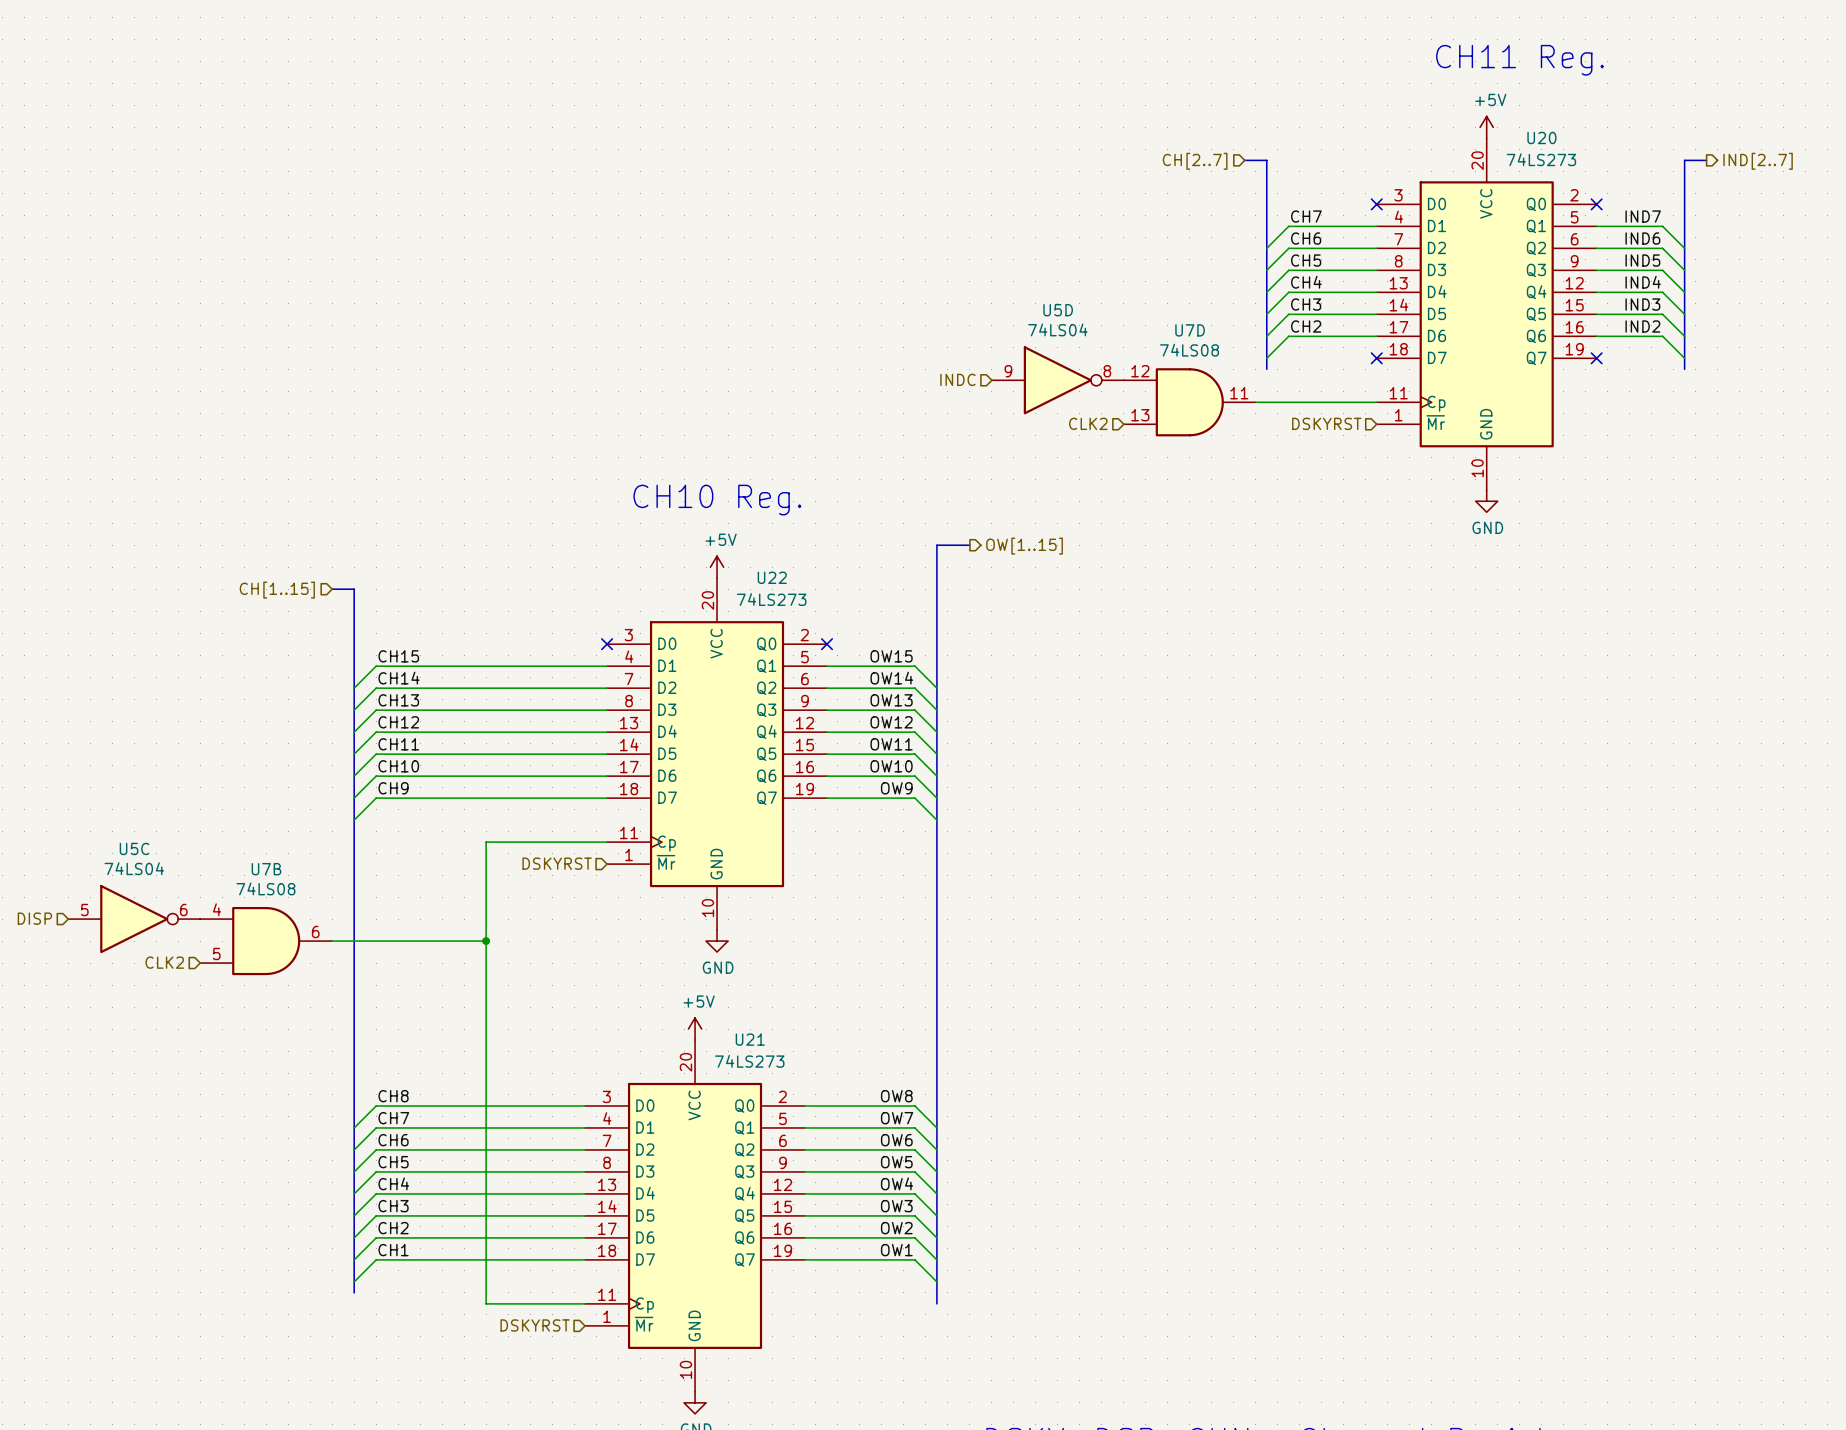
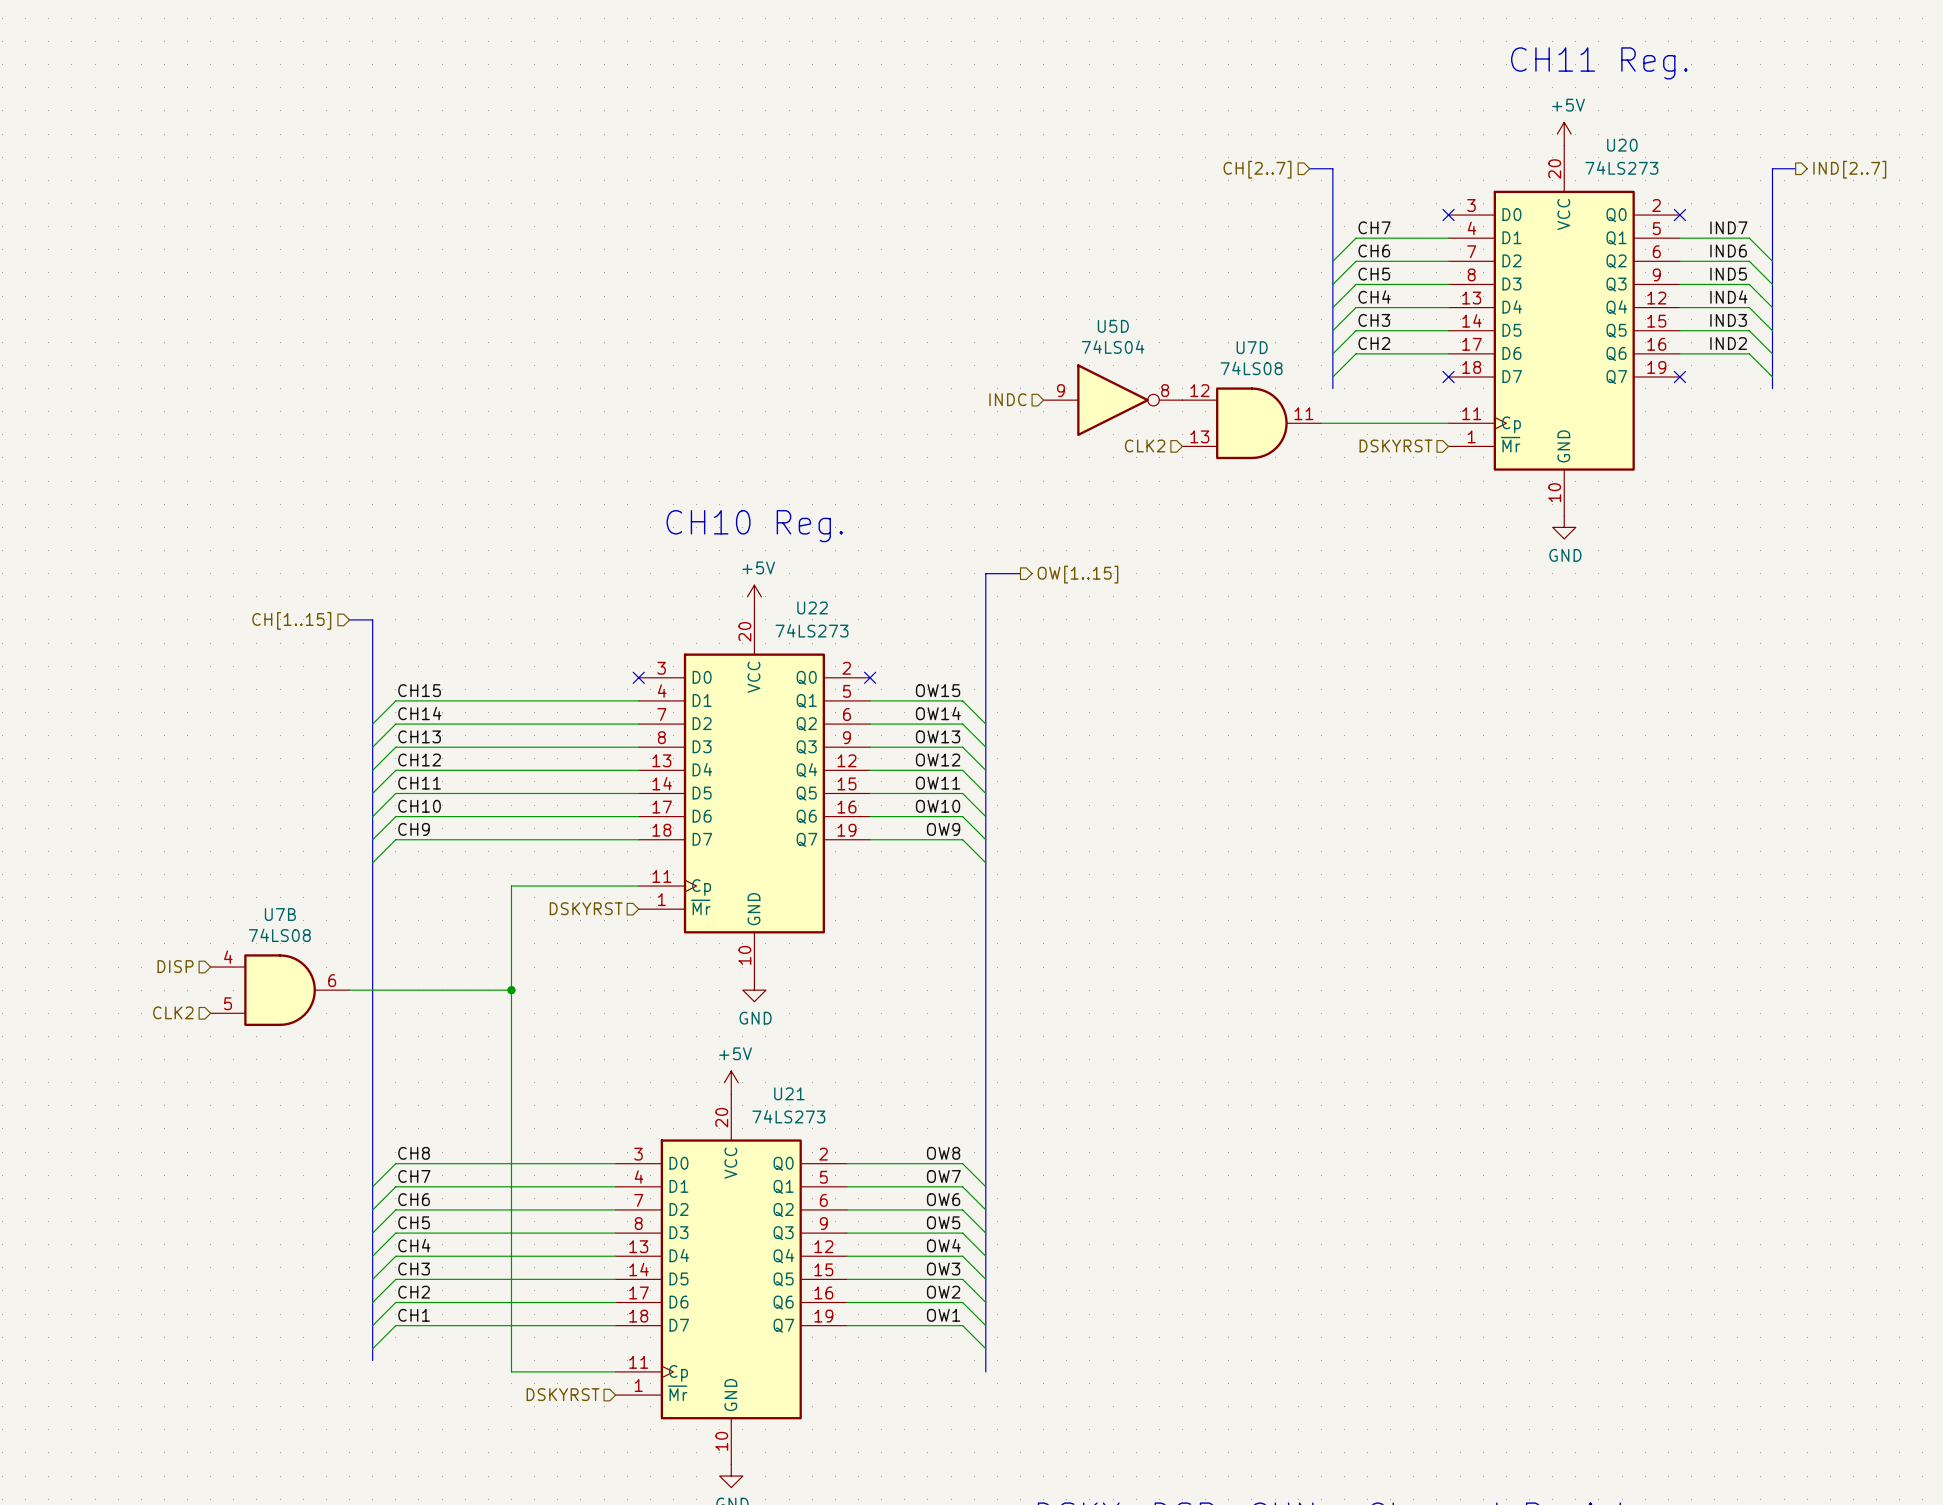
hierarchical label position: DISP (34, 918) -> DISP (175, 966)
U5C: 74LS04 (134, 919) -> none

